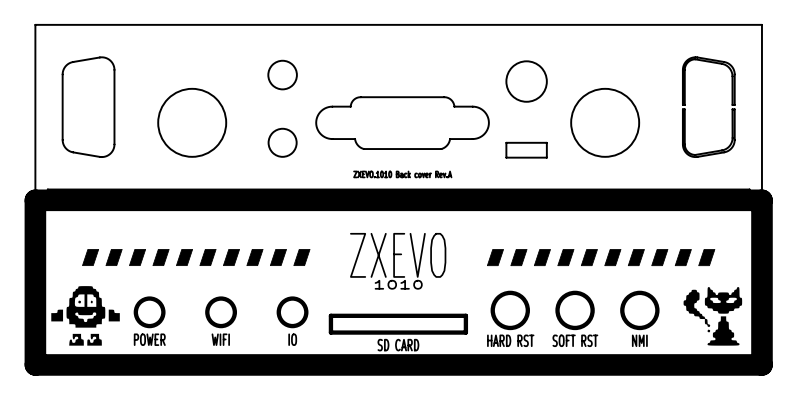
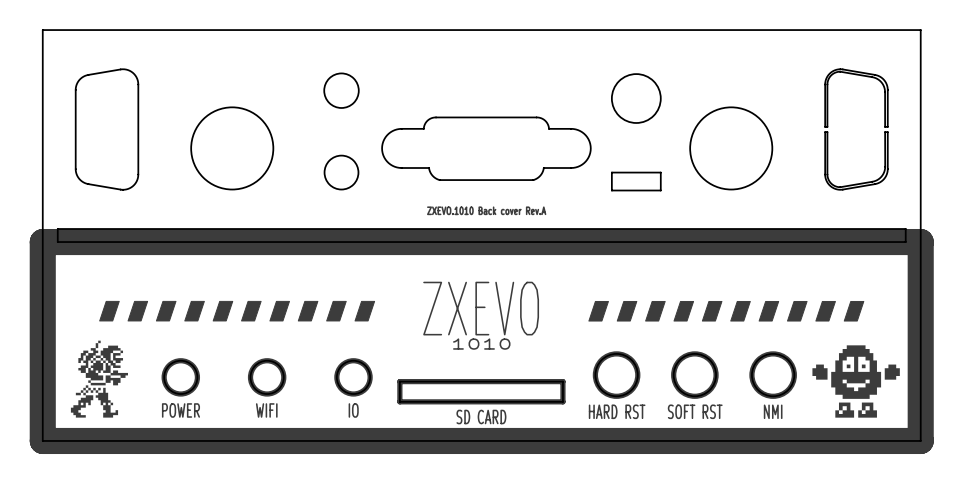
drawing shape: [51, 286, 120, 346] -> [70, 340, 128, 418]
drawing shape: [683, 287, 743, 346] -> [812, 345, 900, 418]

